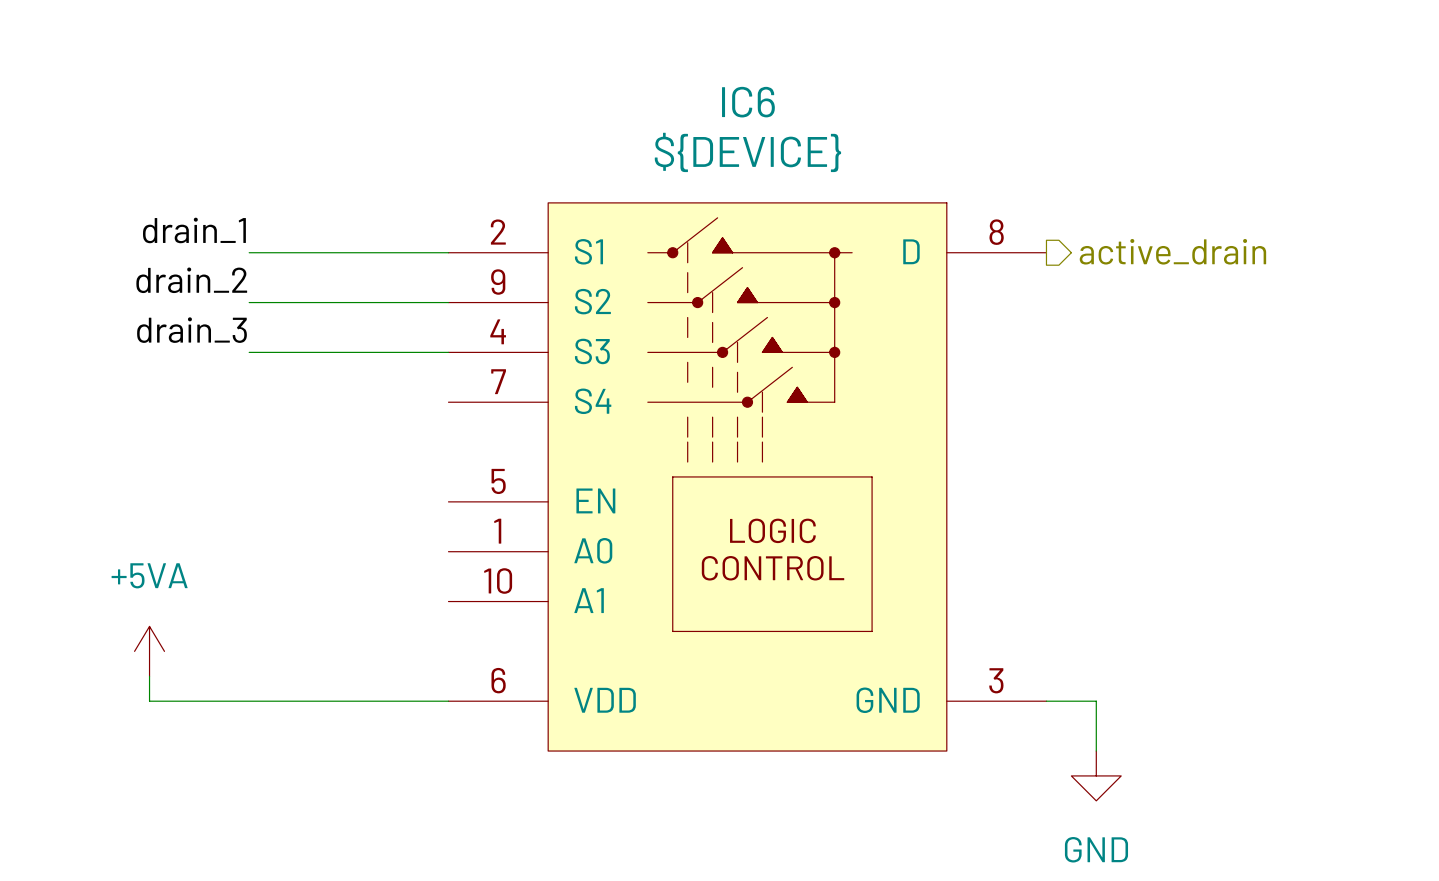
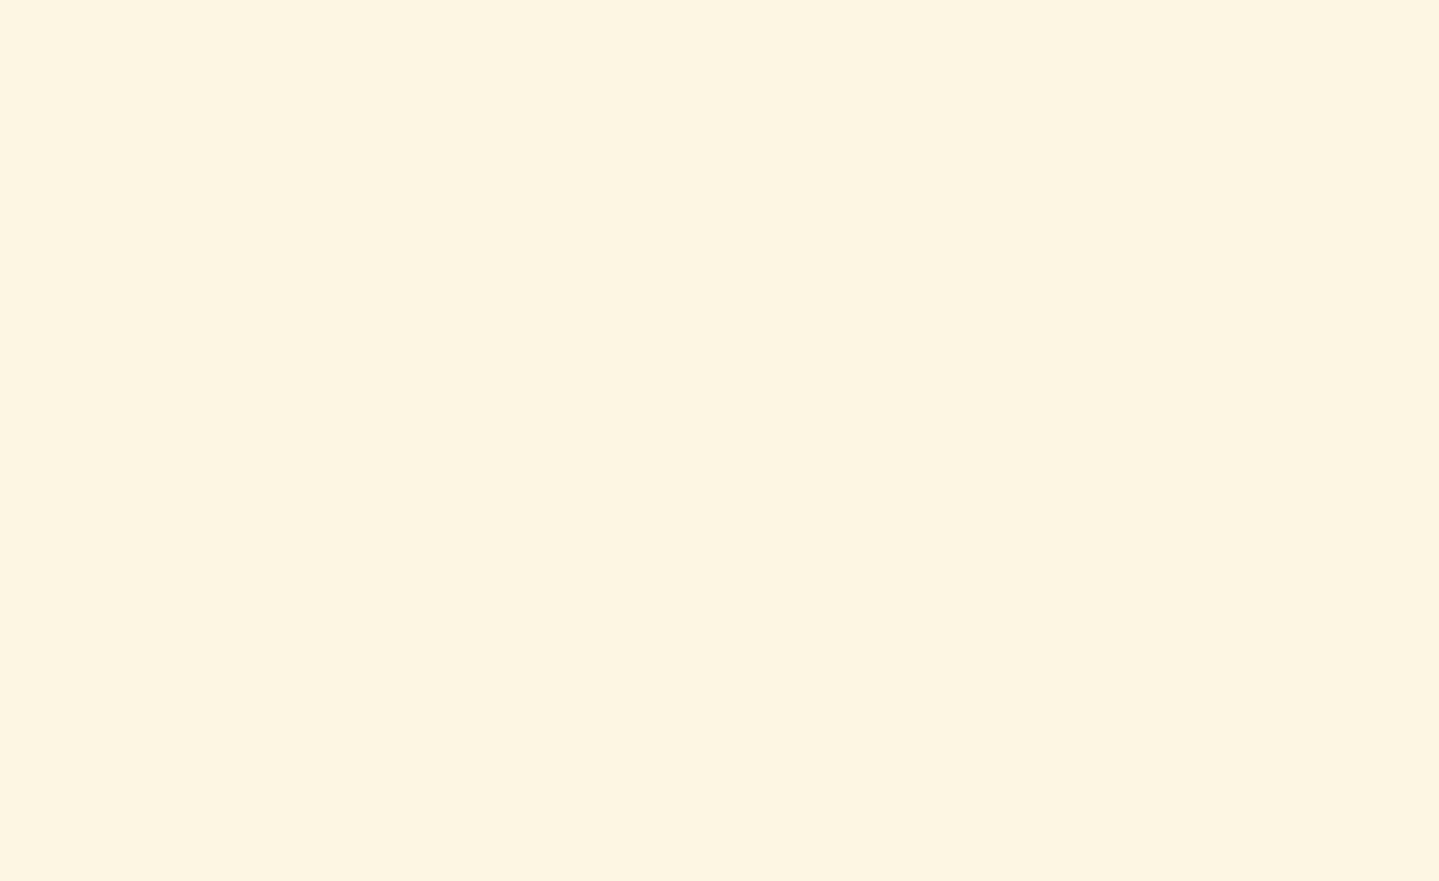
label: drain_1 (194, 230) -> none
hierarchical label: active_drain (1172, 251) -> none
wire: (249, 252) (448, 252) -> none
label: drain_2 (191, 280) -> none
wire: (249, 302) (448, 302) -> none
label: drain_3 (192, 330) -> none
wire: (249, 352) (448, 352) -> none
IC6: ${DEVICE} (747, 476) -> none
power symbol: +5VA (149, 651) -> none
wire: (149, 676) (149, 701) (448, 701) -> none
wire: (1046, 701) (1096, 701) (1096, 751) -> none
power symbol: GND (1096, 775) -> none

